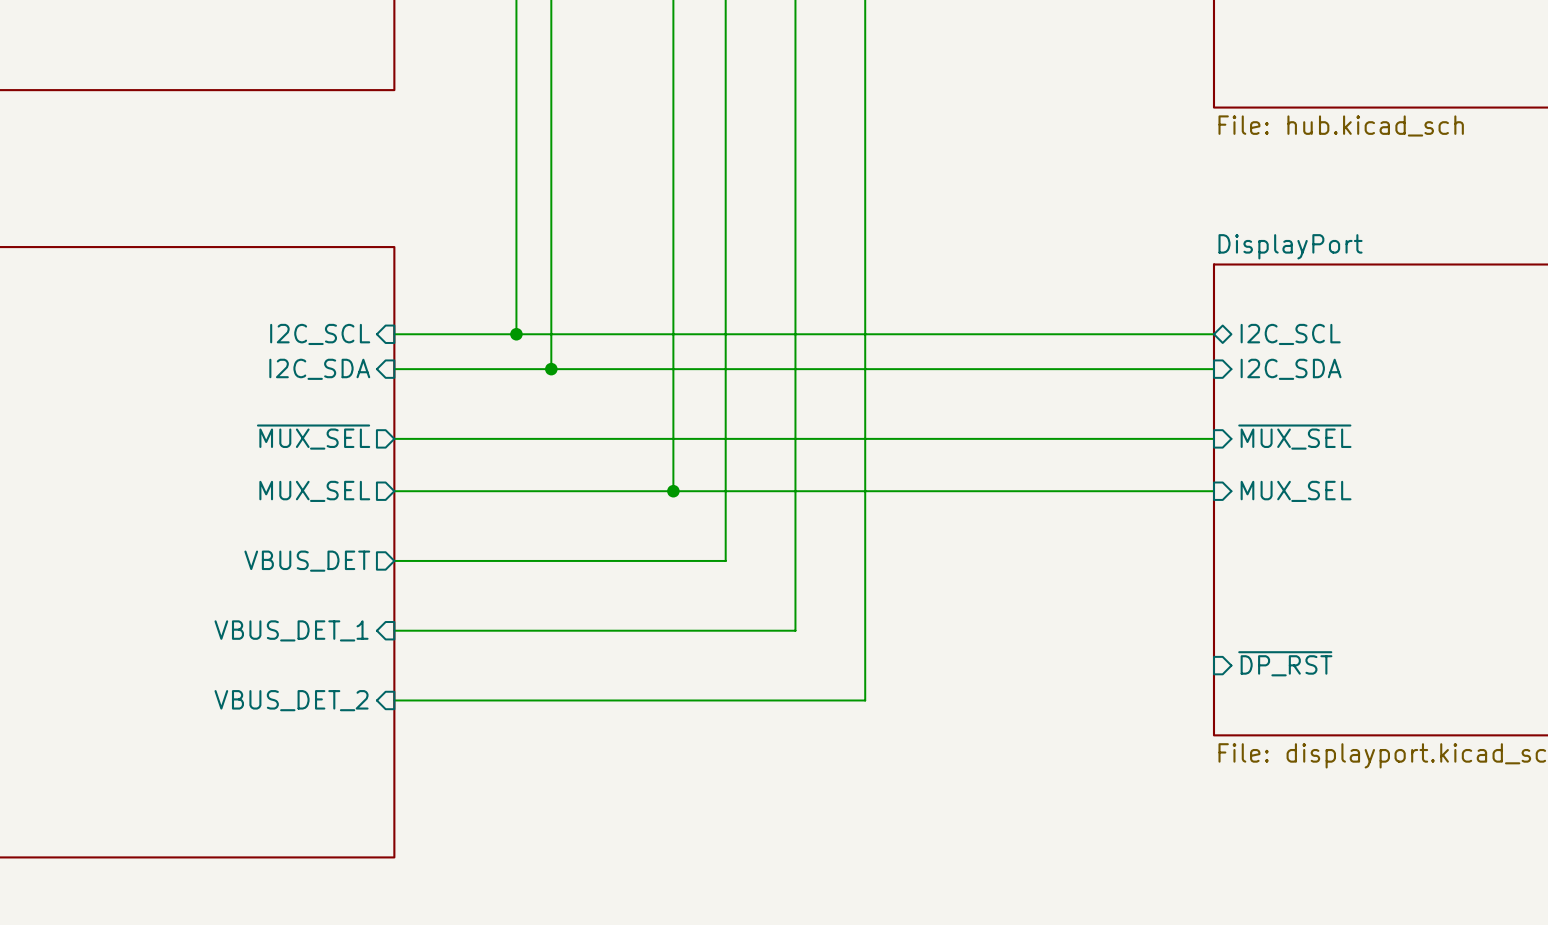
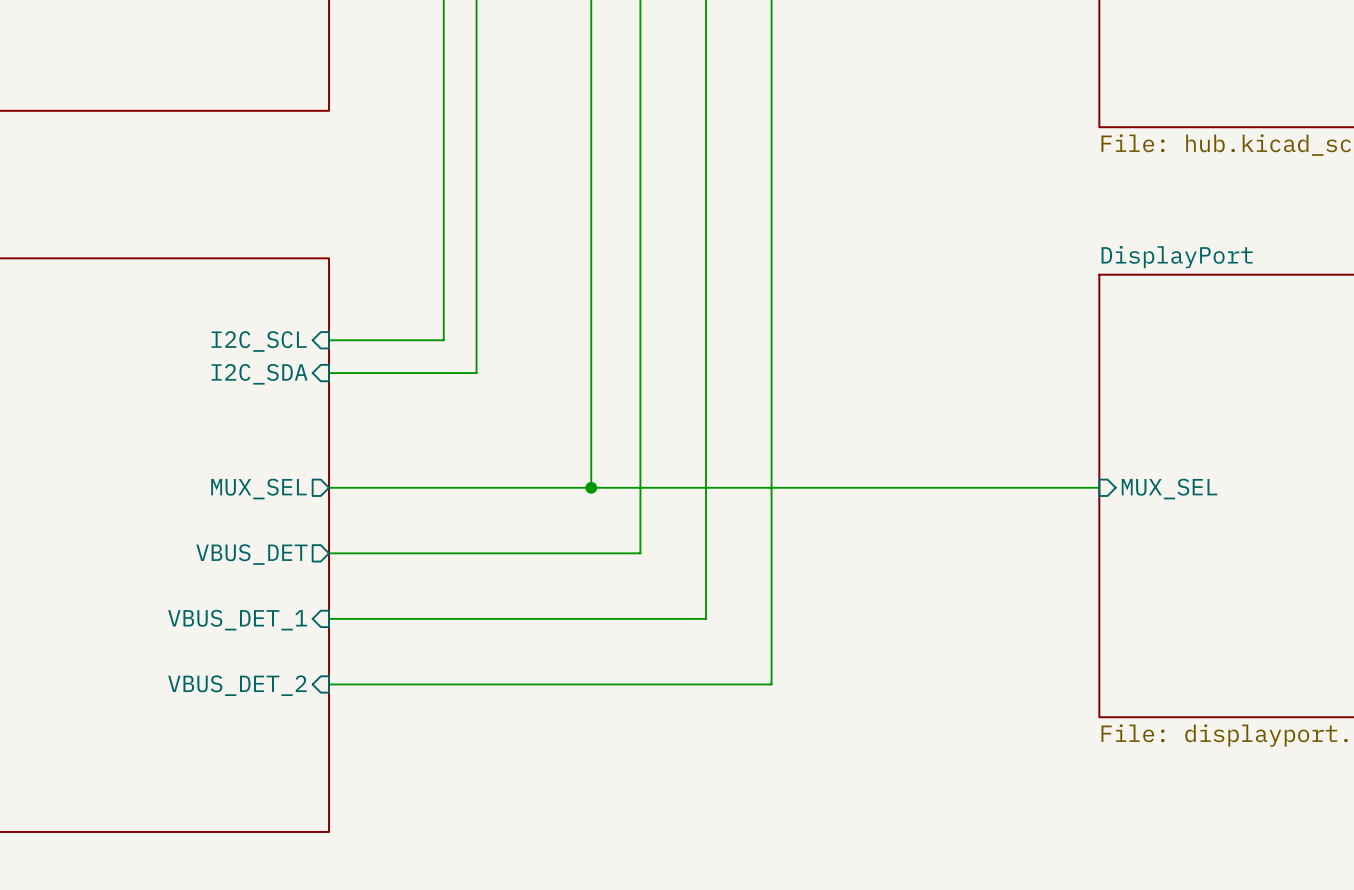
wire: (516, 334) (1213, 334) -> none
junction: (516, 334) -> none
sheet pin: I2C_SCL (1290, 334) -> none
wire: (551, 369) (1213, 369) -> none
junction: (551, 369) -> none
sheet pin: I2C_SDA (1291, 369) -> none
sheet pin: ~{MUX_SEL} (313, 437) -> none
sheet pin: ~{MUX_SEL} (1294, 437) -> none
wire: (394, 438) (1213, 438) -> none
sheet pin: ~{DP_RST} (1285, 663) -> none

